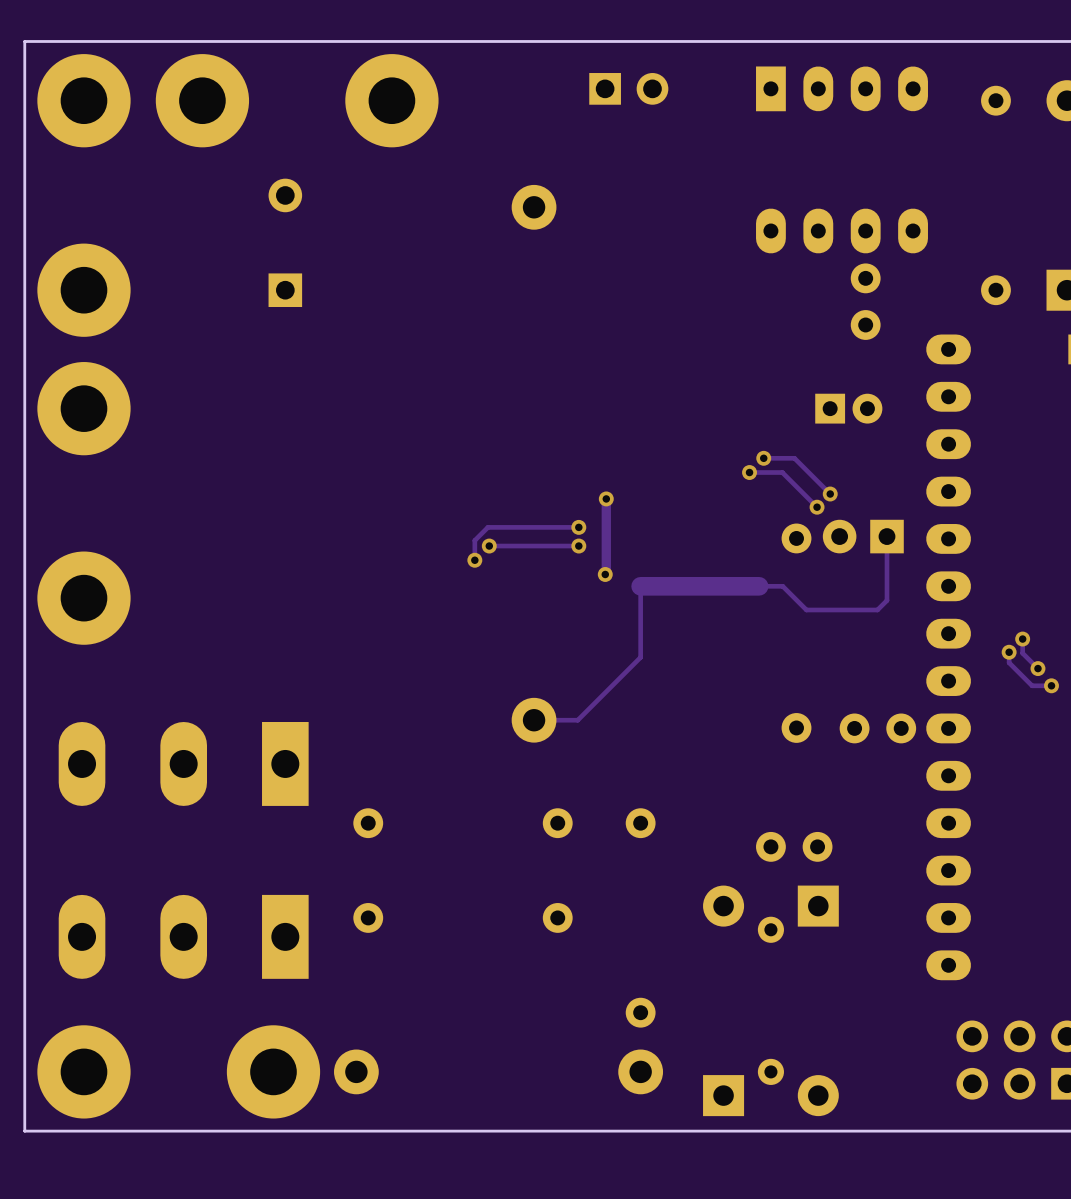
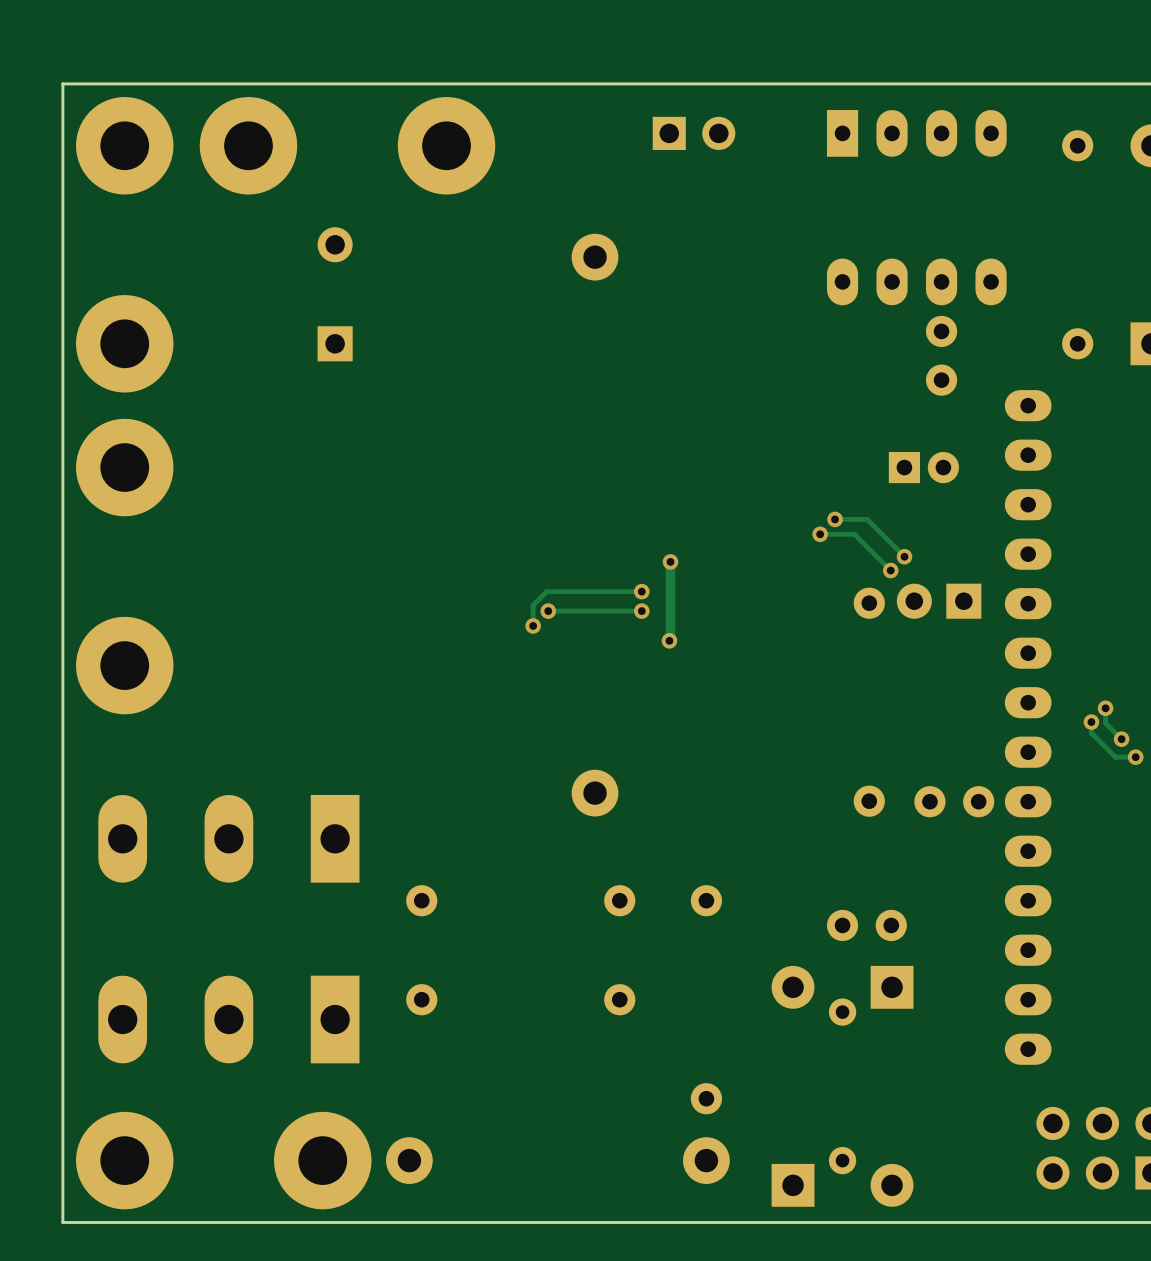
track: (887, 536) (887, 600) (877, 609) (806, 609) (782, 586) (640, 586) (640, 657) (577, 720) (534, 720) -> none

